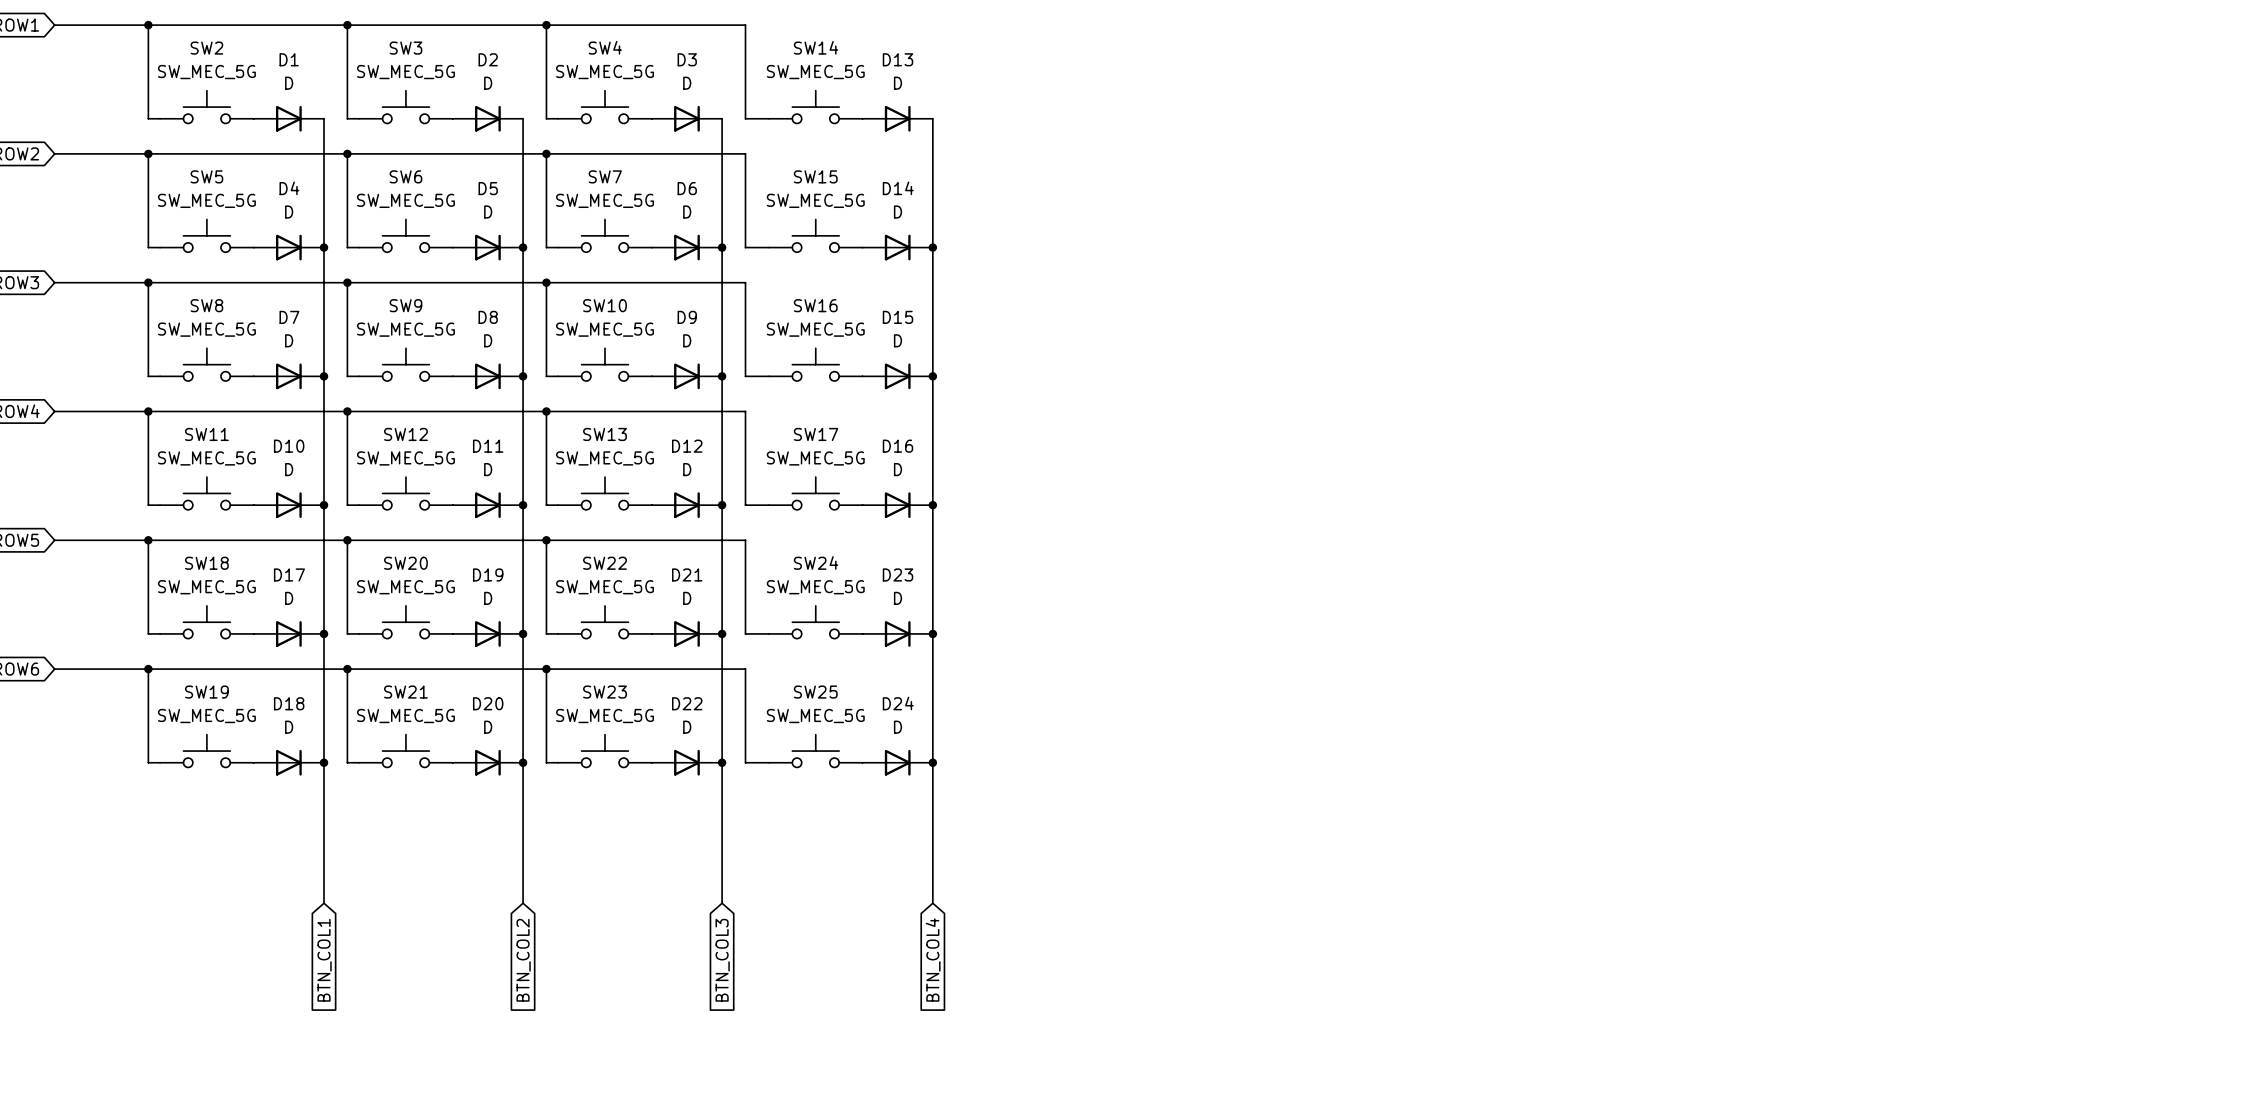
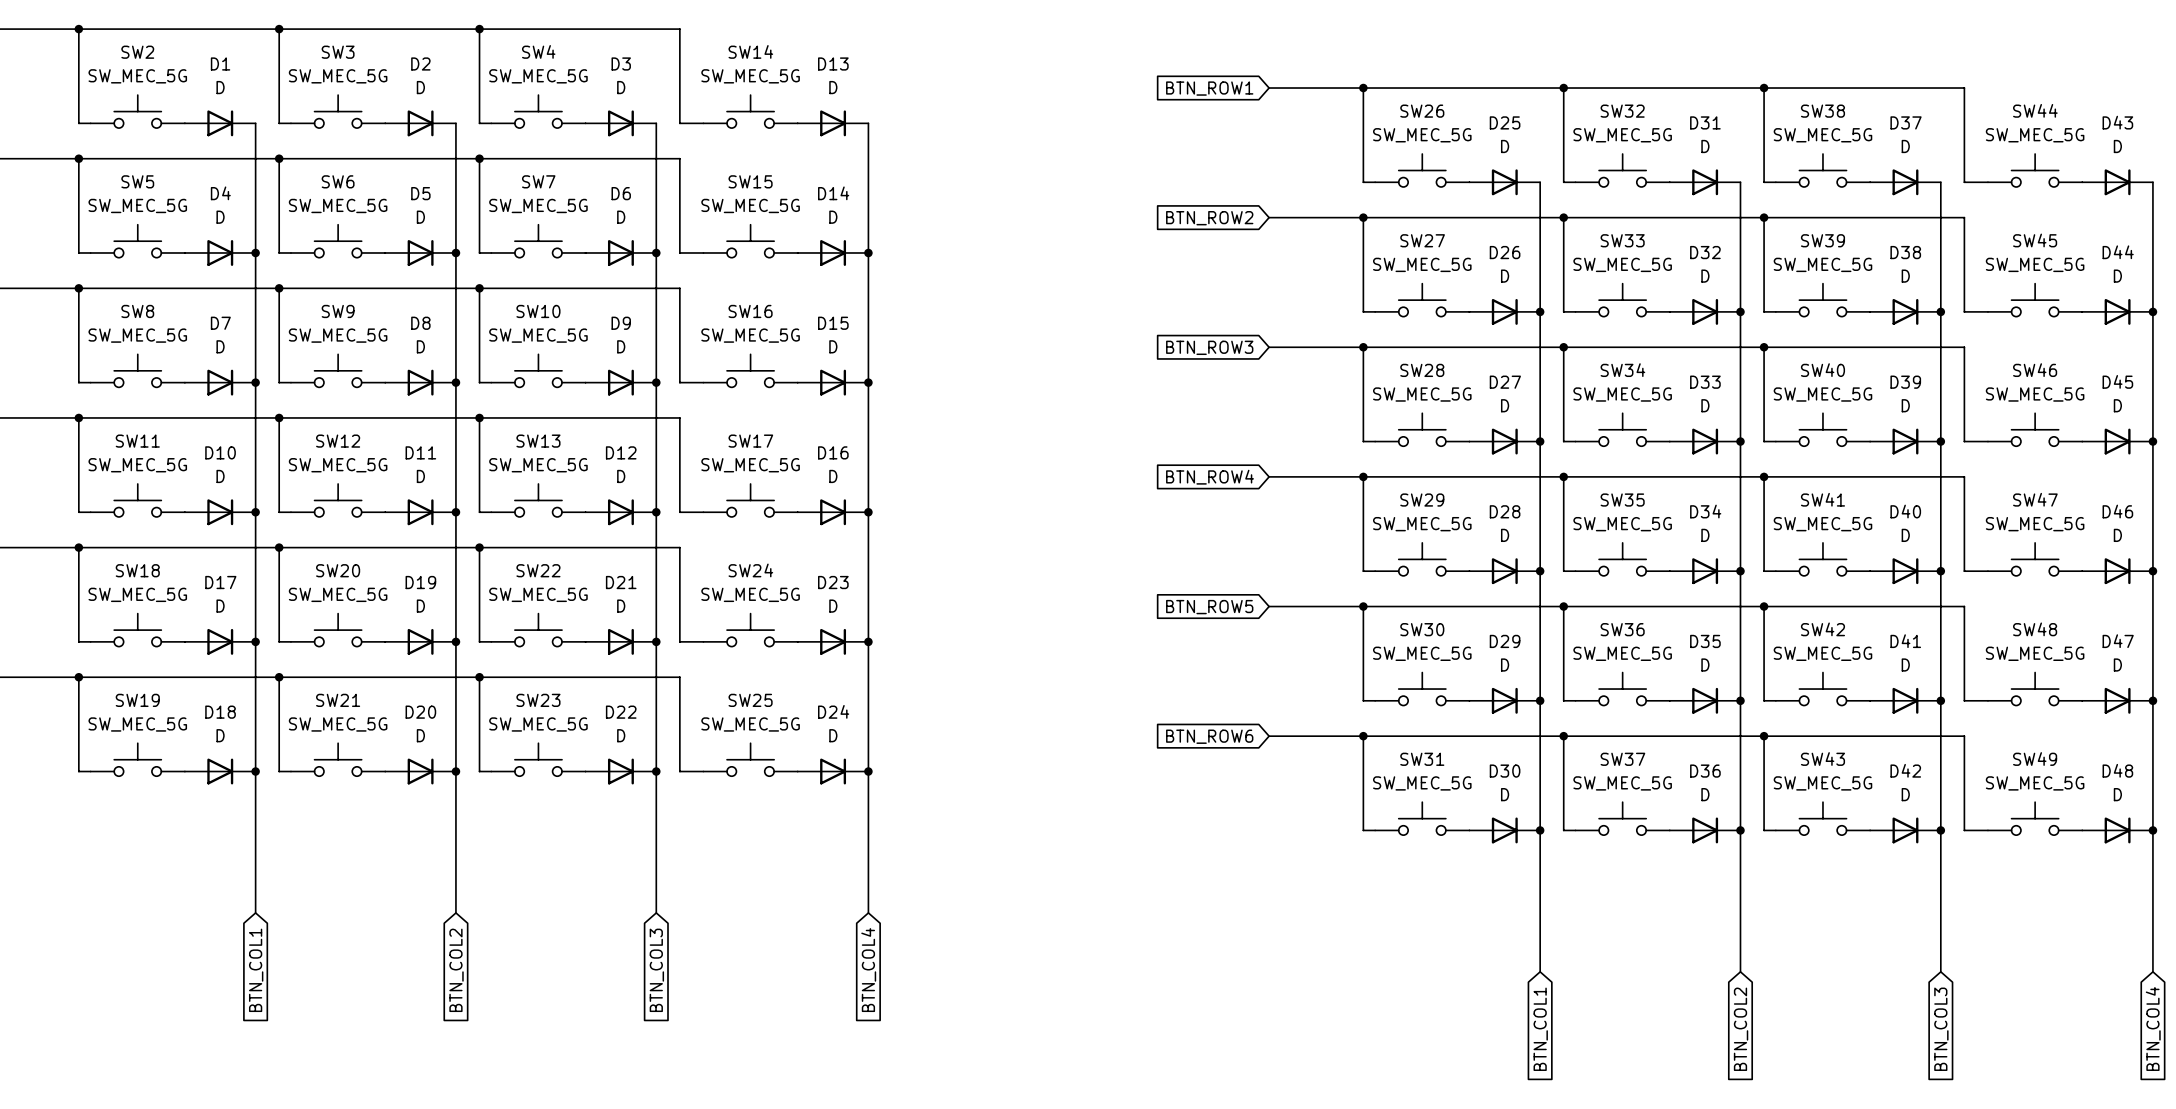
wire: none -> (1269, 88) (1964, 88) (1964, 182) (1987, 182)
wire: none -> (1363, 88) (1363, 182) (1375, 182)
junction: none -> (1363, 88)
wire: none -> (1563, 88) (1563, 182) (1575, 182)
junction: none -> (1563, 88)
wire: none -> (1764, 88) (1764, 182) (1775, 182)
junction: none -> (1764, 88)
global label: none -> BTN_ROW1 (1209, 88)
SW26: none -> SW_MEC_5G (1422, 170)
SW32: none -> SW_MEC_5G (1622, 170)
SW38: none -> SW_MEC_5G (1822, 170)
SW44: none -> SW_MEC_5G (2035, 170)
D25: none -> D (1504, 182)
wire: none -> (1540, 182) (1540, 971)
D31: none -> D (1705, 182)
wire: none -> (1740, 182) (1740, 971)
D37: none -> D (1905, 182)
wire: none -> (1940, 182) (1940, 971)
D43: none -> D (2117, 182)
wire: none -> (2152, 182) (2152, 971)
wire: none -> (1269, 217) (1964, 217) (1964, 311) (1987, 311)
wire: none -> (1363, 217) (1363, 311) (1375, 311)
junction: none -> (1363, 217)
wire: none -> (1563, 217) (1563, 311) (1575, 311)
junction: none -> (1563, 217)
wire: none -> (1764, 217) (1764, 311) (1775, 311)
junction: none -> (1764, 217)
global label: none -> BTN_ROW2 (1209, 218)
SW27: none -> SW_MEC_5G (1422, 300)
SW33: none -> SW_MEC_5G (1622, 300)
SW39: none -> SW_MEC_5G (1822, 300)
SW45: none -> SW_MEC_5G (2035, 300)
D26: none -> D (1504, 311)
junction: none -> (1540, 311)
D32: none -> D (1705, 311)
junction: none -> (1740, 311)
D38: none -> D (1905, 311)
junction: none -> (1940, 311)
D44: none -> D (2117, 311)
junction: none -> (2152, 311)
global label: none -> BTN_ROW3 (1209, 347)
wire: none -> (1269, 347) (1964, 347) (1964, 441) (1987, 441)
wire: none -> (1363, 347) (1363, 441) (1375, 441)
junction: none -> (1363, 347)
wire: none -> (1563, 347) (1563, 441) (1575, 441)
junction: none -> (1563, 347)
wire: none -> (1764, 347) (1764, 441) (1775, 441)
junction: none -> (1764, 347)
SW28: none -> SW_MEC_5G (1422, 429)
SW34: none -> SW_MEC_5G (1622, 429)
SW40: none -> SW_MEC_5G (1822, 429)
SW46: none -> SW_MEC_5G (2035, 429)
D27: none -> D (1504, 441)
junction: none -> (1540, 441)
D33: none -> D (1705, 441)
junction: none -> (1740, 441)
D39: none -> D (1905, 441)
junction: none -> (1940, 441)
D45: none -> D (2117, 441)
junction: none -> (2152, 441)
global label: none -> BTN_ROW4 (1210, 477)
wire: none -> (1269, 476) (1964, 476) (1964, 571) (1987, 571)
wire: none -> (1363, 476) (1363, 571) (1375, 571)
junction: none -> (1363, 476)
wire: none -> (1563, 476) (1563, 571) (1575, 571)
junction: none -> (1563, 476)
wire: none -> (1764, 476) (1764, 571) (1775, 571)
junction: none -> (1764, 476)
SW29: none -> SW_MEC_5G (1422, 559)
SW35: none -> SW_MEC_5G (1622, 559)
SW41: none -> SW_MEC_5G (1822, 559)
SW47: none -> SW_MEC_5G (2035, 559)
D28: none -> D (1504, 571)
junction: none -> (1540, 571)
D34: none -> D (1705, 571)
junction: none -> (1740, 571)
D40: none -> D (1905, 571)
junction: none -> (1940, 571)
D46: none -> D (2117, 571)
junction: none -> (2152, 571)
wire: none -> (1269, 606) (1964, 606) (1964, 700) (1987, 700)
wire: none -> (1363, 606) (1363, 700) (1375, 700)
junction: none -> (1363, 606)
wire: none -> (1563, 606) (1563, 700) (1575, 700)
junction: none -> (1563, 606)
wire: none -> (1764, 606) (1764, 700) (1775, 700)
junction: none -> (1764, 606)
global label: none -> BTN_ROW5 (1209, 607)
SW30: none -> SW_MEC_5G (1422, 689)
SW36: none -> SW_MEC_5G (1622, 689)
SW42: none -> SW_MEC_5G (1822, 689)
SW48: none -> SW_MEC_5G (2035, 689)
D29: none -> D (1504, 700)
junction: none -> (1540, 700)
D35: none -> D (1705, 700)
junction: none -> (1740, 700)
D41: none -> D (1905, 700)
junction: none -> (1940, 700)
D47: none -> D (2117, 700)
junction: none -> (2152, 700)
wire: none -> (1269, 736) (1964, 736) (1964, 830) (1987, 830)
wire: none -> (1363, 736) (1363, 830) (1375, 830)
junction: none -> (1363, 736)
wire: none -> (1563, 736) (1563, 830) (1575, 830)
junction: none -> (1563, 736)
wire: none -> (1764, 736) (1764, 830) (1775, 830)
junction: none -> (1764, 736)
global label: none -> BTN_ROW6 (1209, 736)
SW31: none -> SW_MEC_5G (1422, 818)
SW37: none -> SW_MEC_5G (1622, 818)
SW43: none -> SW_MEC_5G (1822, 818)
SW49: none -> SW_MEC_5G (2035, 818)
D30: none -> D (1504, 830)
junction: none -> (1540, 830)
D36: none -> D (1705, 830)
junction: none -> (1740, 830)
D42: none -> D (1905, 830)
junction: none -> (1940, 830)
D48: none -> D (2117, 830)
junction: none -> (2152, 830)
global label: none -> BTN_COL1 (1540, 1029)
global label: none -> BTN_COL2 (1741, 1029)
global label: none -> BTN_COL3 (1941, 1029)
global label: none -> BTN_COL4 (2153, 1028)

